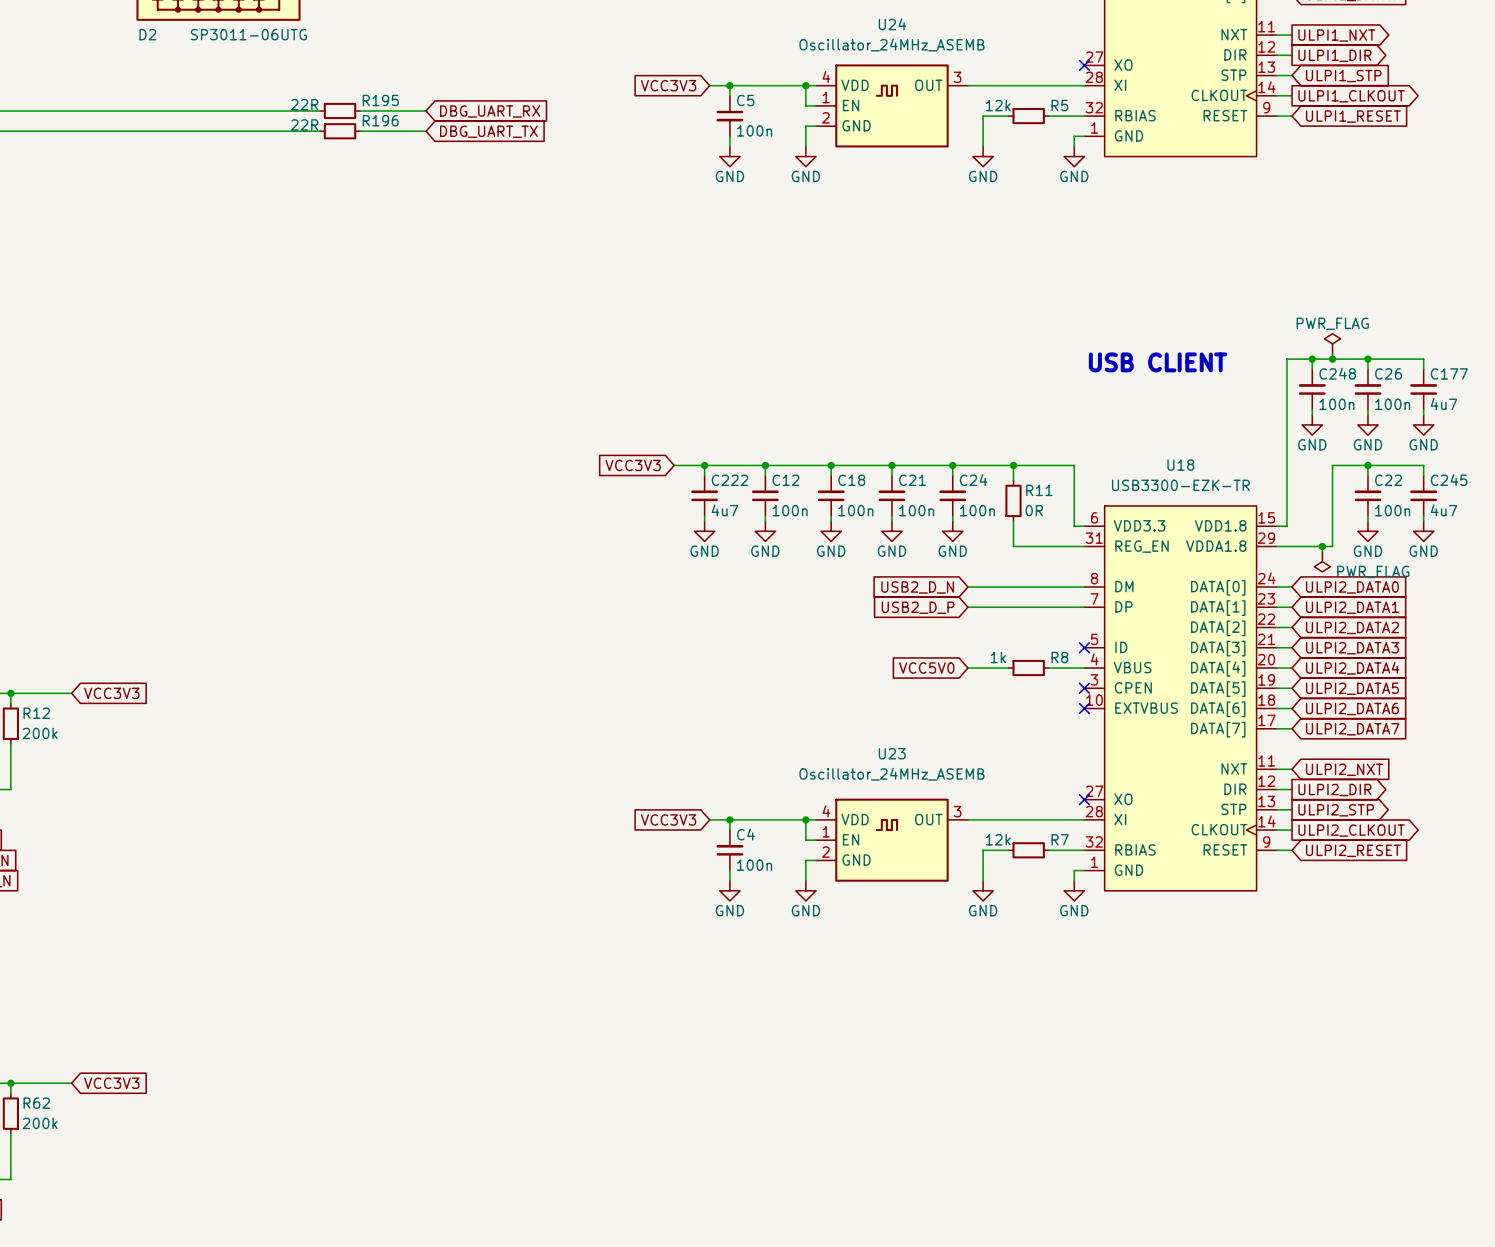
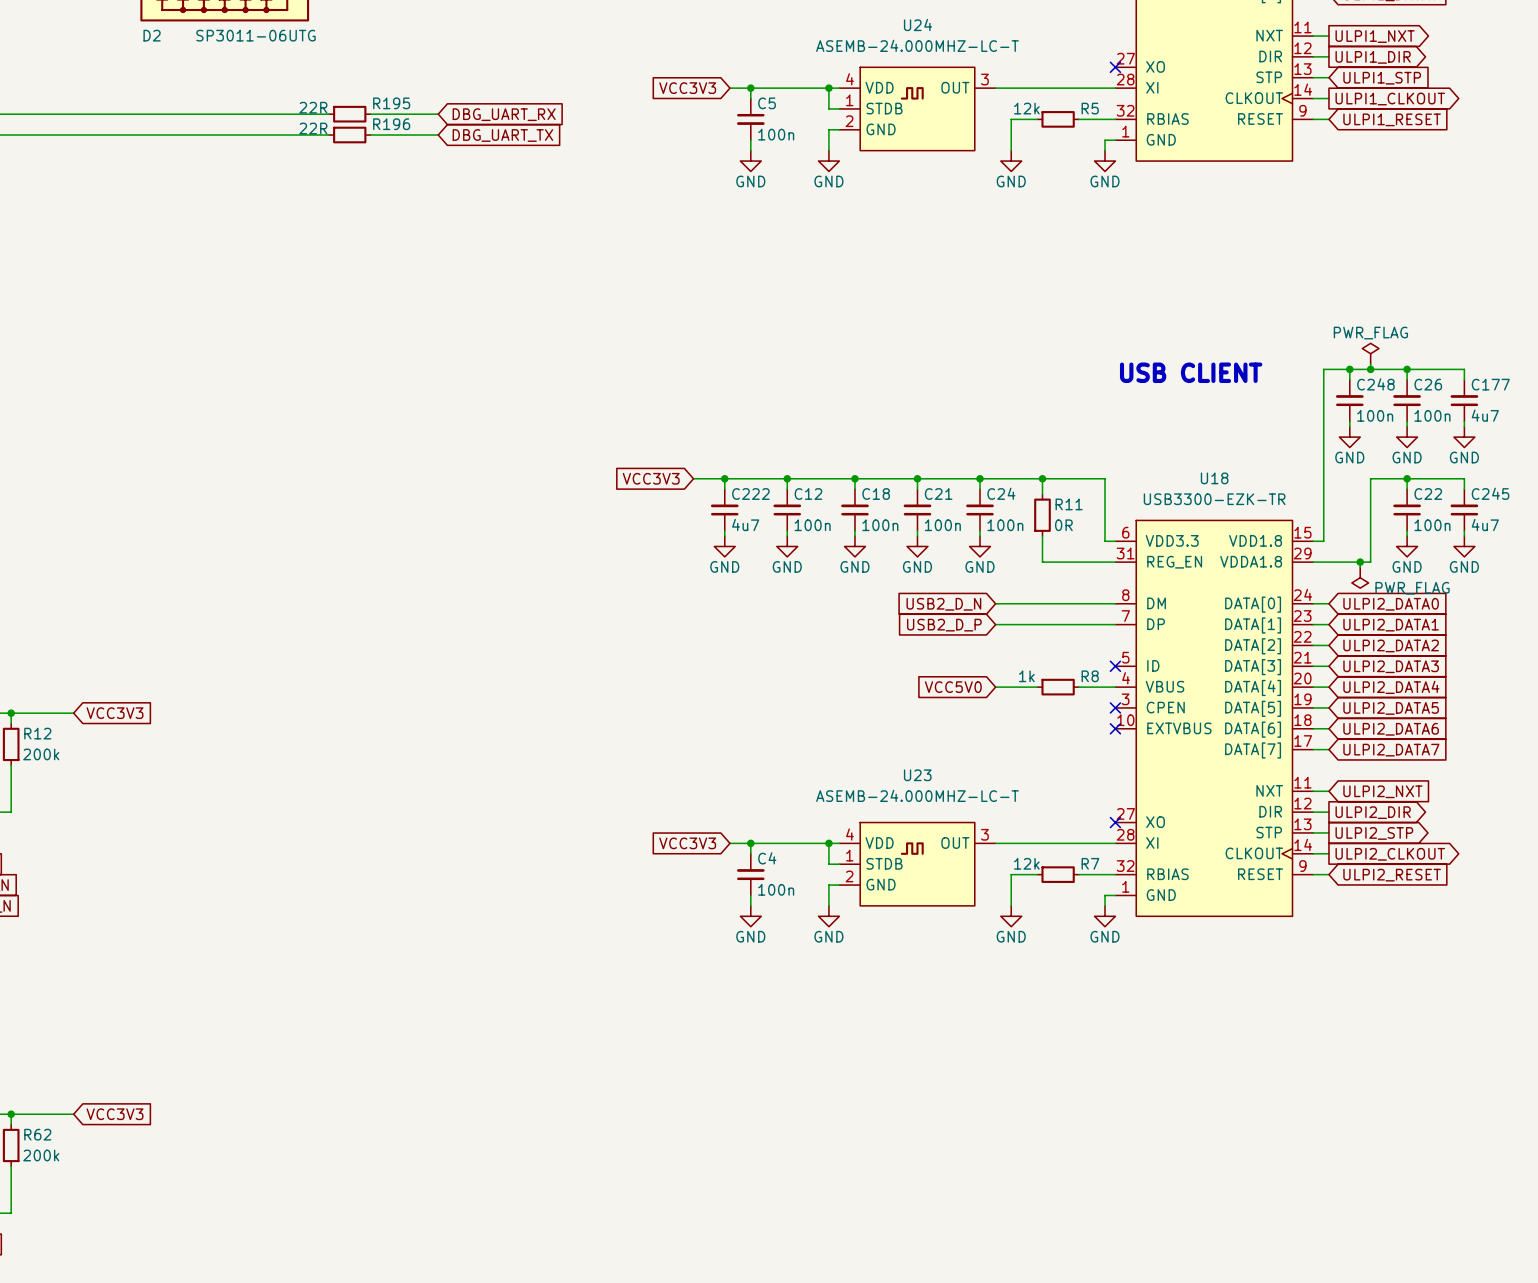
U24 value: Oscillator_24MHz_ASEMB (891, 45) -> ASEMB-24.000MHZ-LC-T (917, 45)
U24 symbol: [816, 64, 968, 148] -> [839, 67, 996, 151]
U23 value: Oscillator_24MHz_ASEMB (891, 774) -> ASEMB-24.000MHZ-LC-T (917, 795)
U23 symbol: [816, 798, 968, 882] -> [839, 822, 996, 906]

